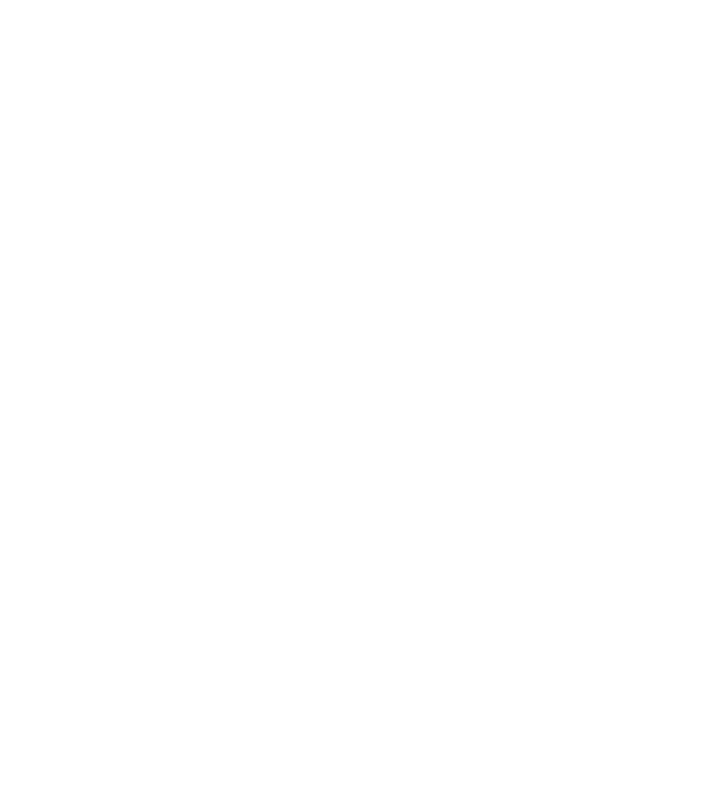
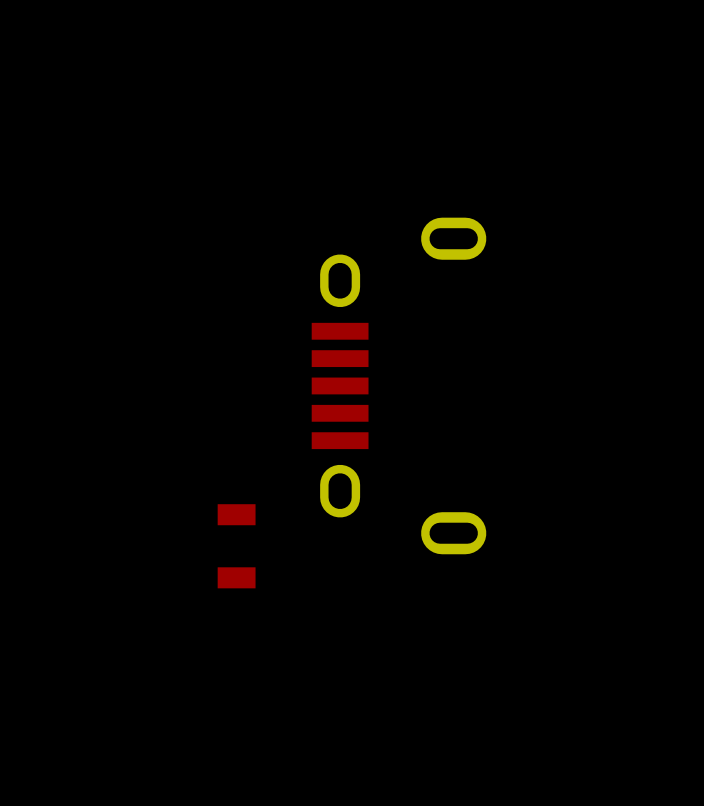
part: none -> (399, 385)
part: none -> (236, 546)

